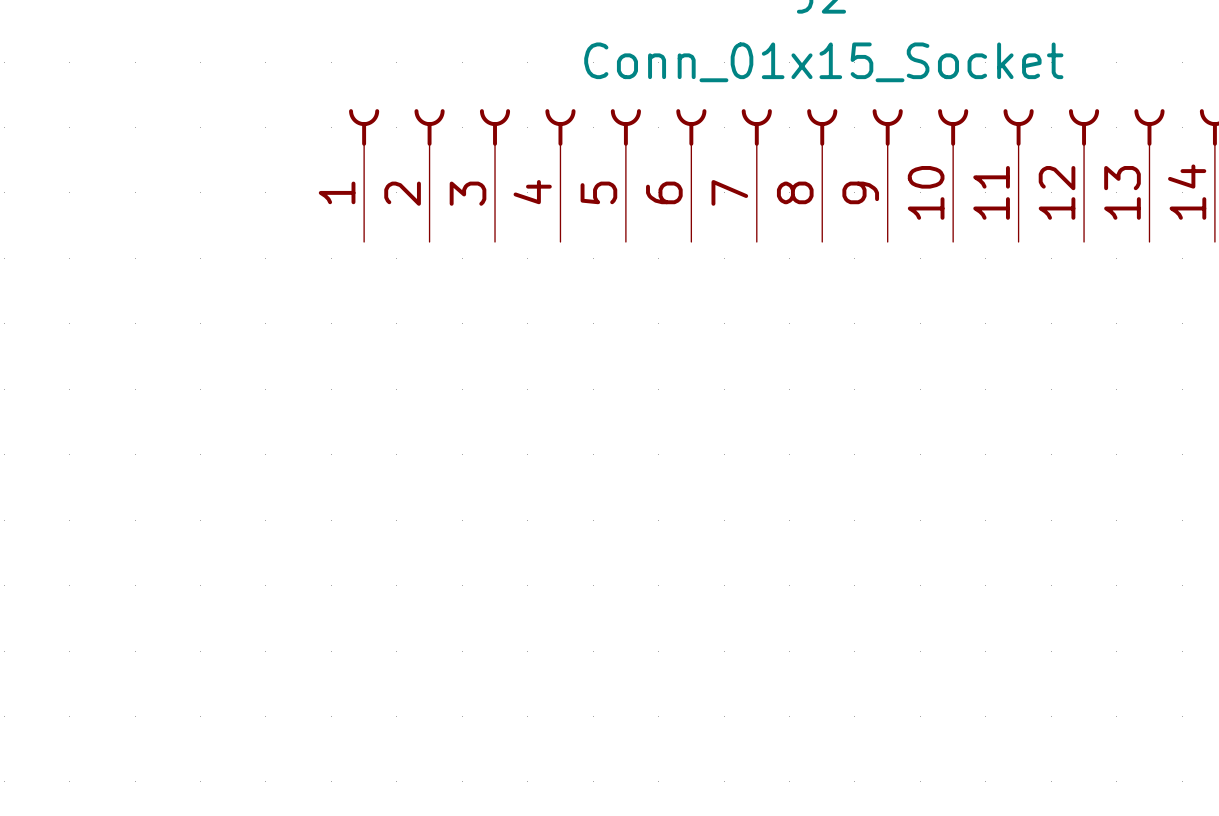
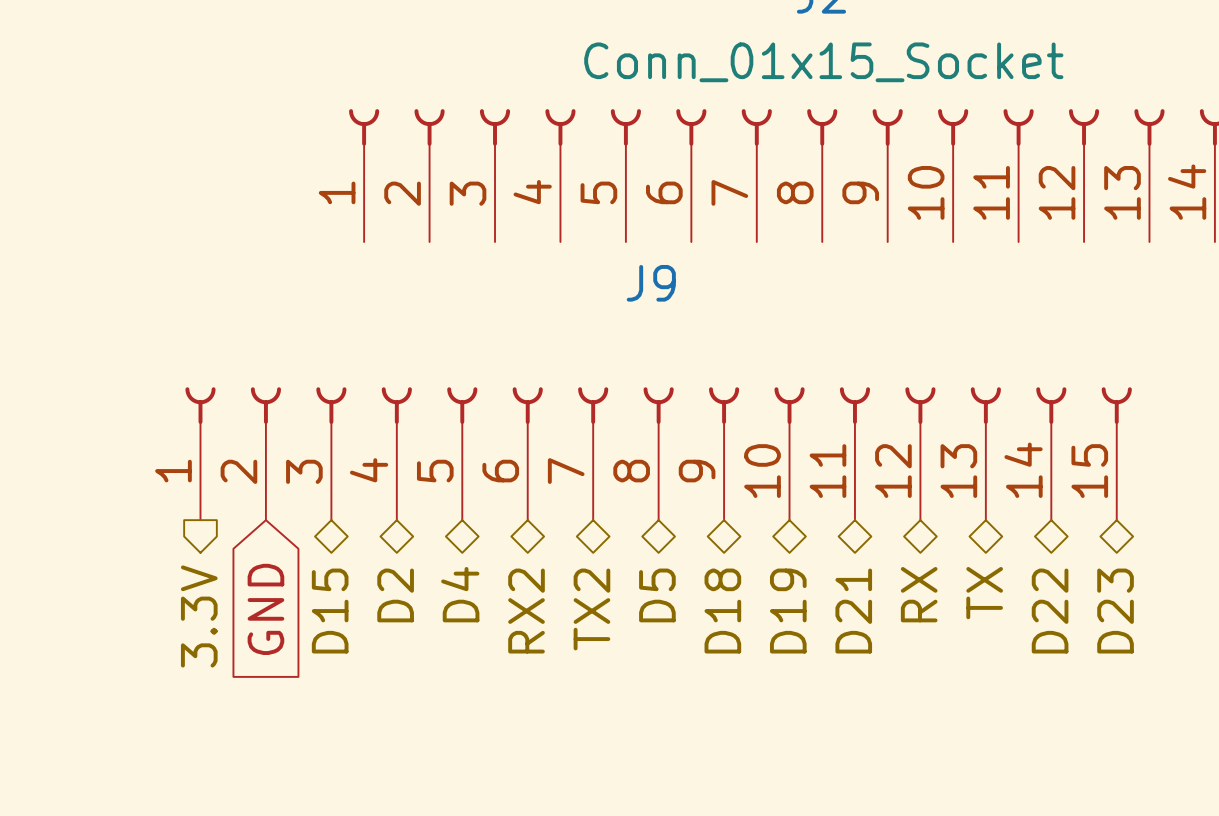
J9: none -> (658, 453)
hierarchical label: none -> TX (984, 593)
hierarchical label: none -> D4 (460, 594)
hierarchical label: none -> RX (919, 594)
hierarchical label: none -> D2 (395, 595)
hierarchical label: none -> D5 (657, 595)
global label: none -> GND (265, 609)
hierarchical label: none -> TX2 (591, 609)
hierarchical label: none -> D15 (330, 611)
hierarchical label: none -> RX2 (526, 611)
hierarchical label: none -> D18 (722, 611)
hierarchical label: none -> D19 (788, 611)
hierarchical label: none -> D21 (853, 611)
hierarchical label: none -> D22 (1050, 611)
hierarchical label: none -> D23 (1115, 611)
hierarchical label: none -> 3.3V (199, 616)

